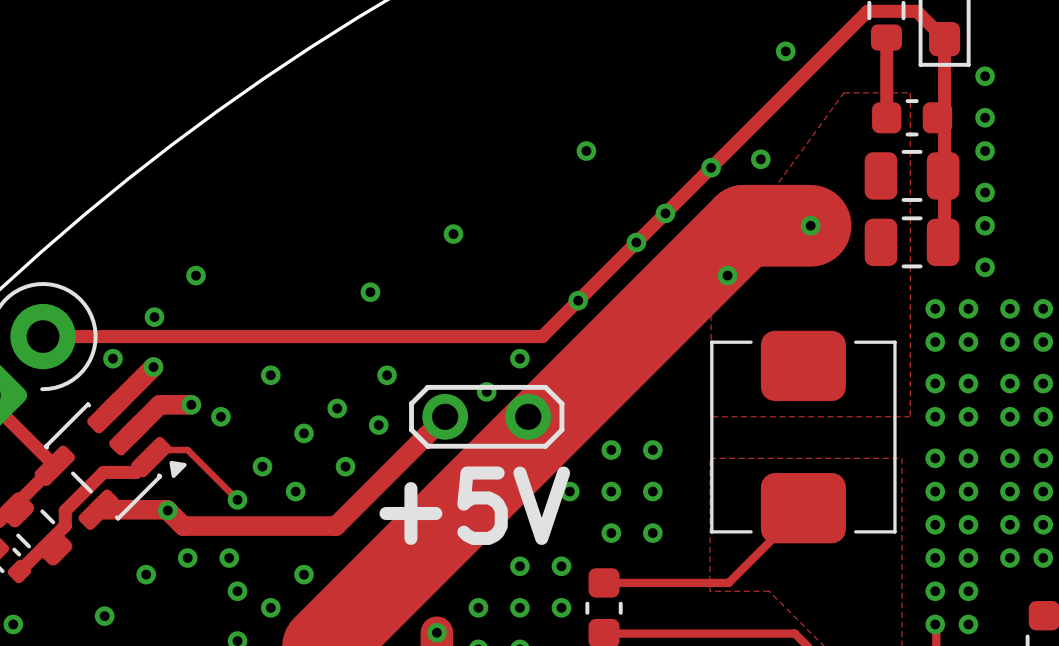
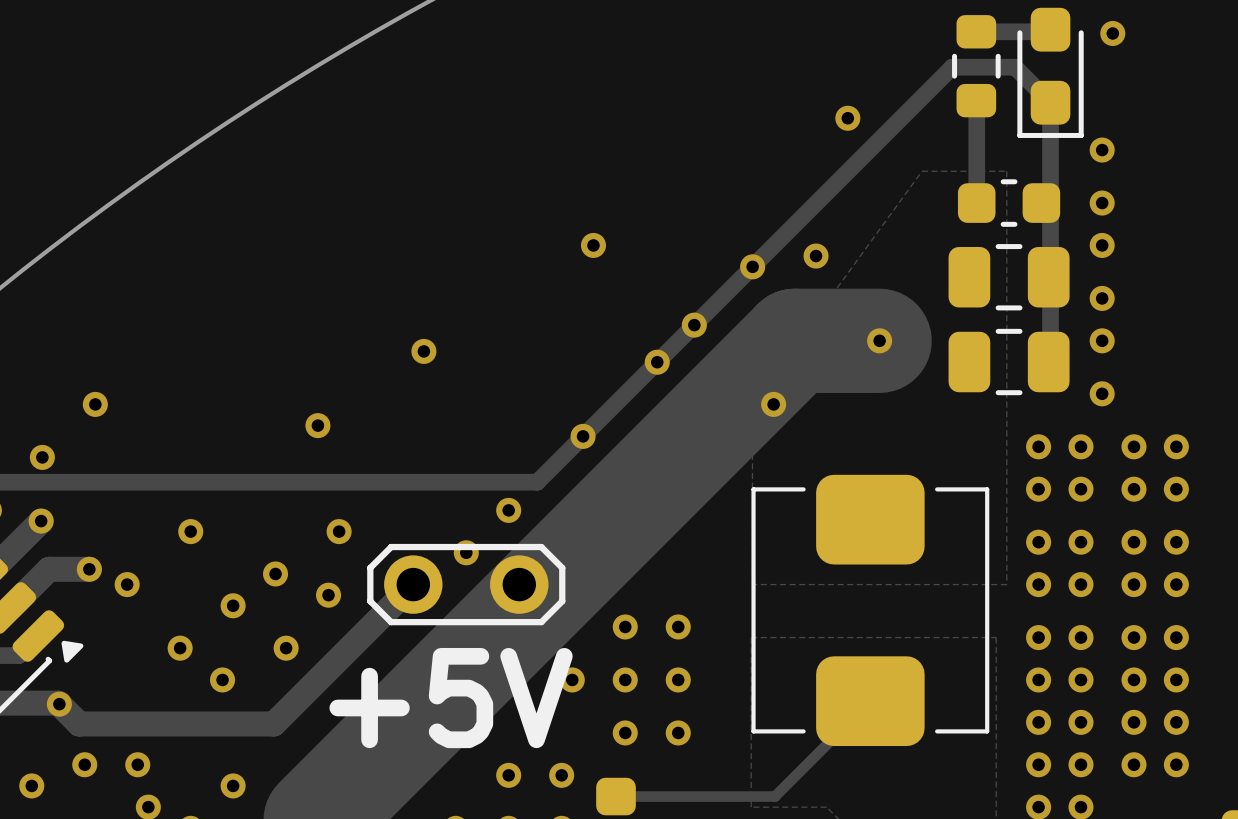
track: (151, 457) (158, 450) (187, 450) (237, 499) -> none
via: (237, 499) -> none

